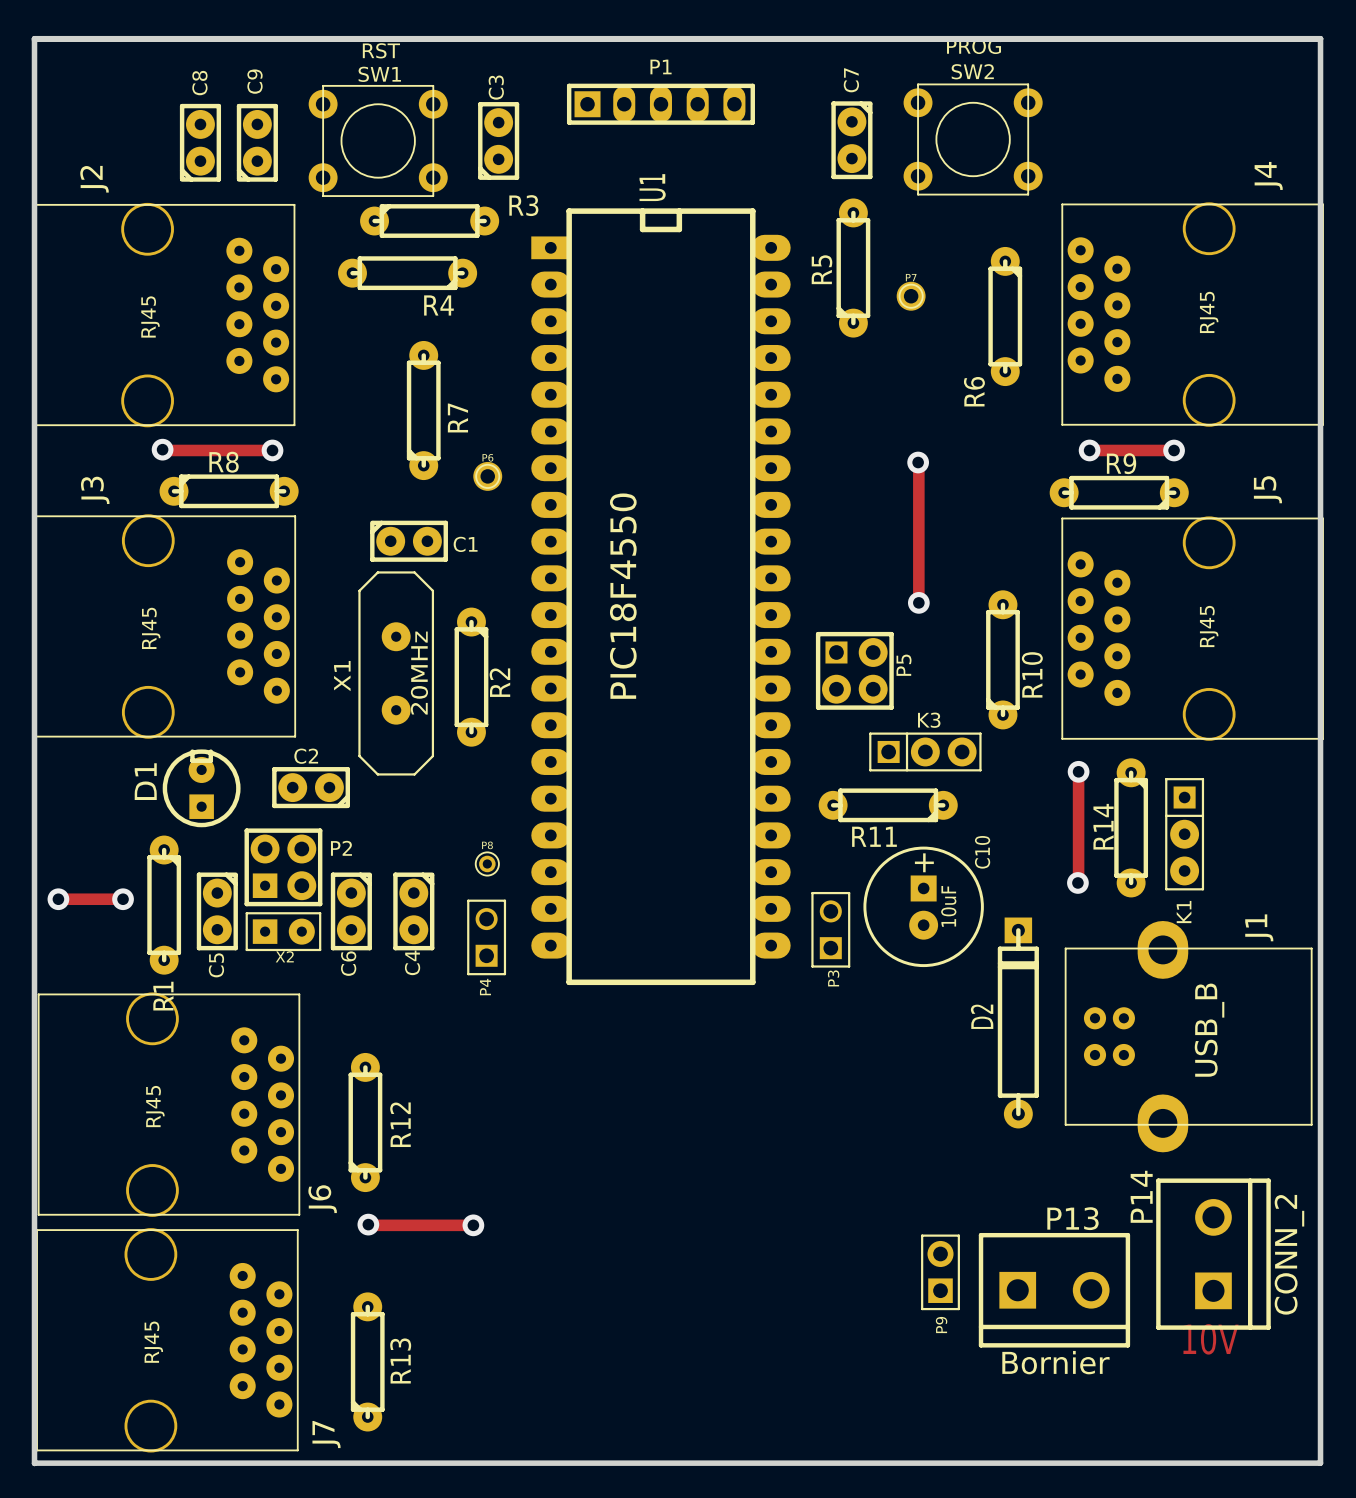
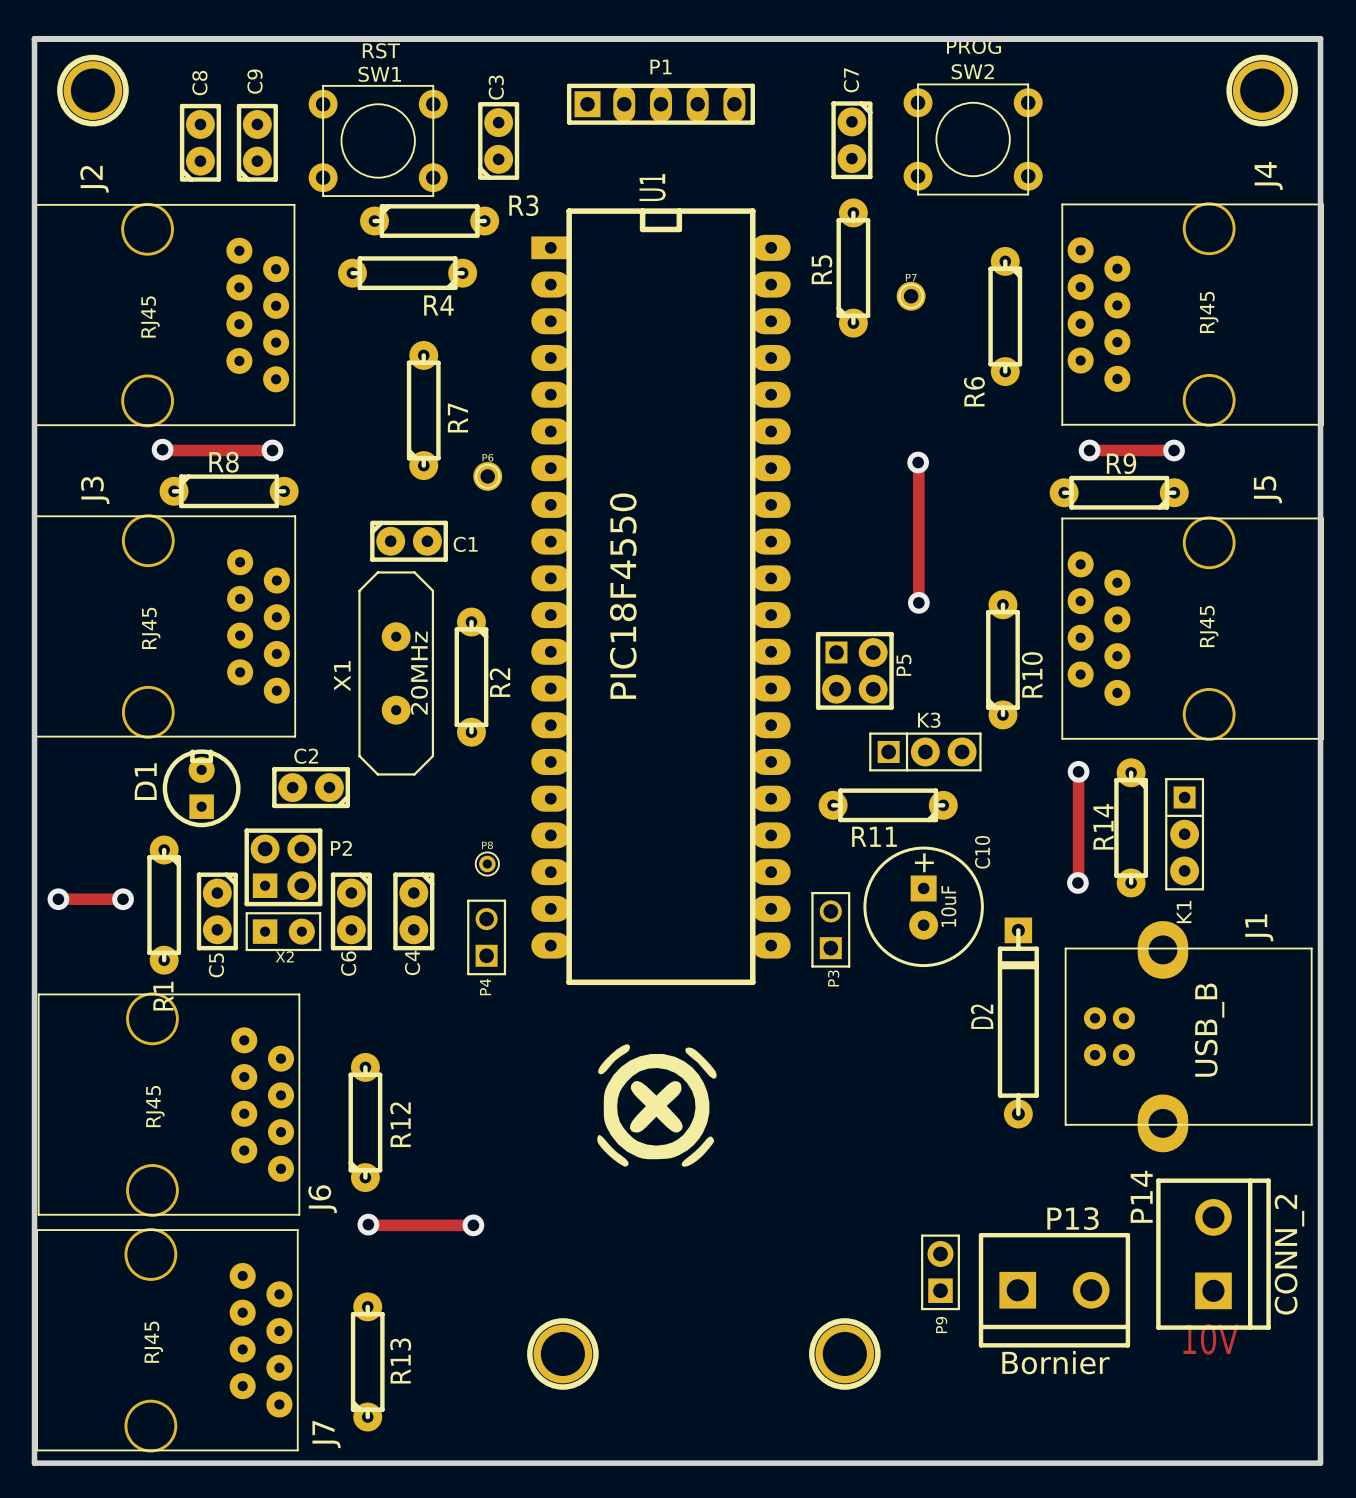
part: none -> (92, 90)
part: none -> (1262, 90)
drawing: none -> [597, 1044, 717, 1167]
part: none -> (562, 1353)
part: none -> (844, 1353)

